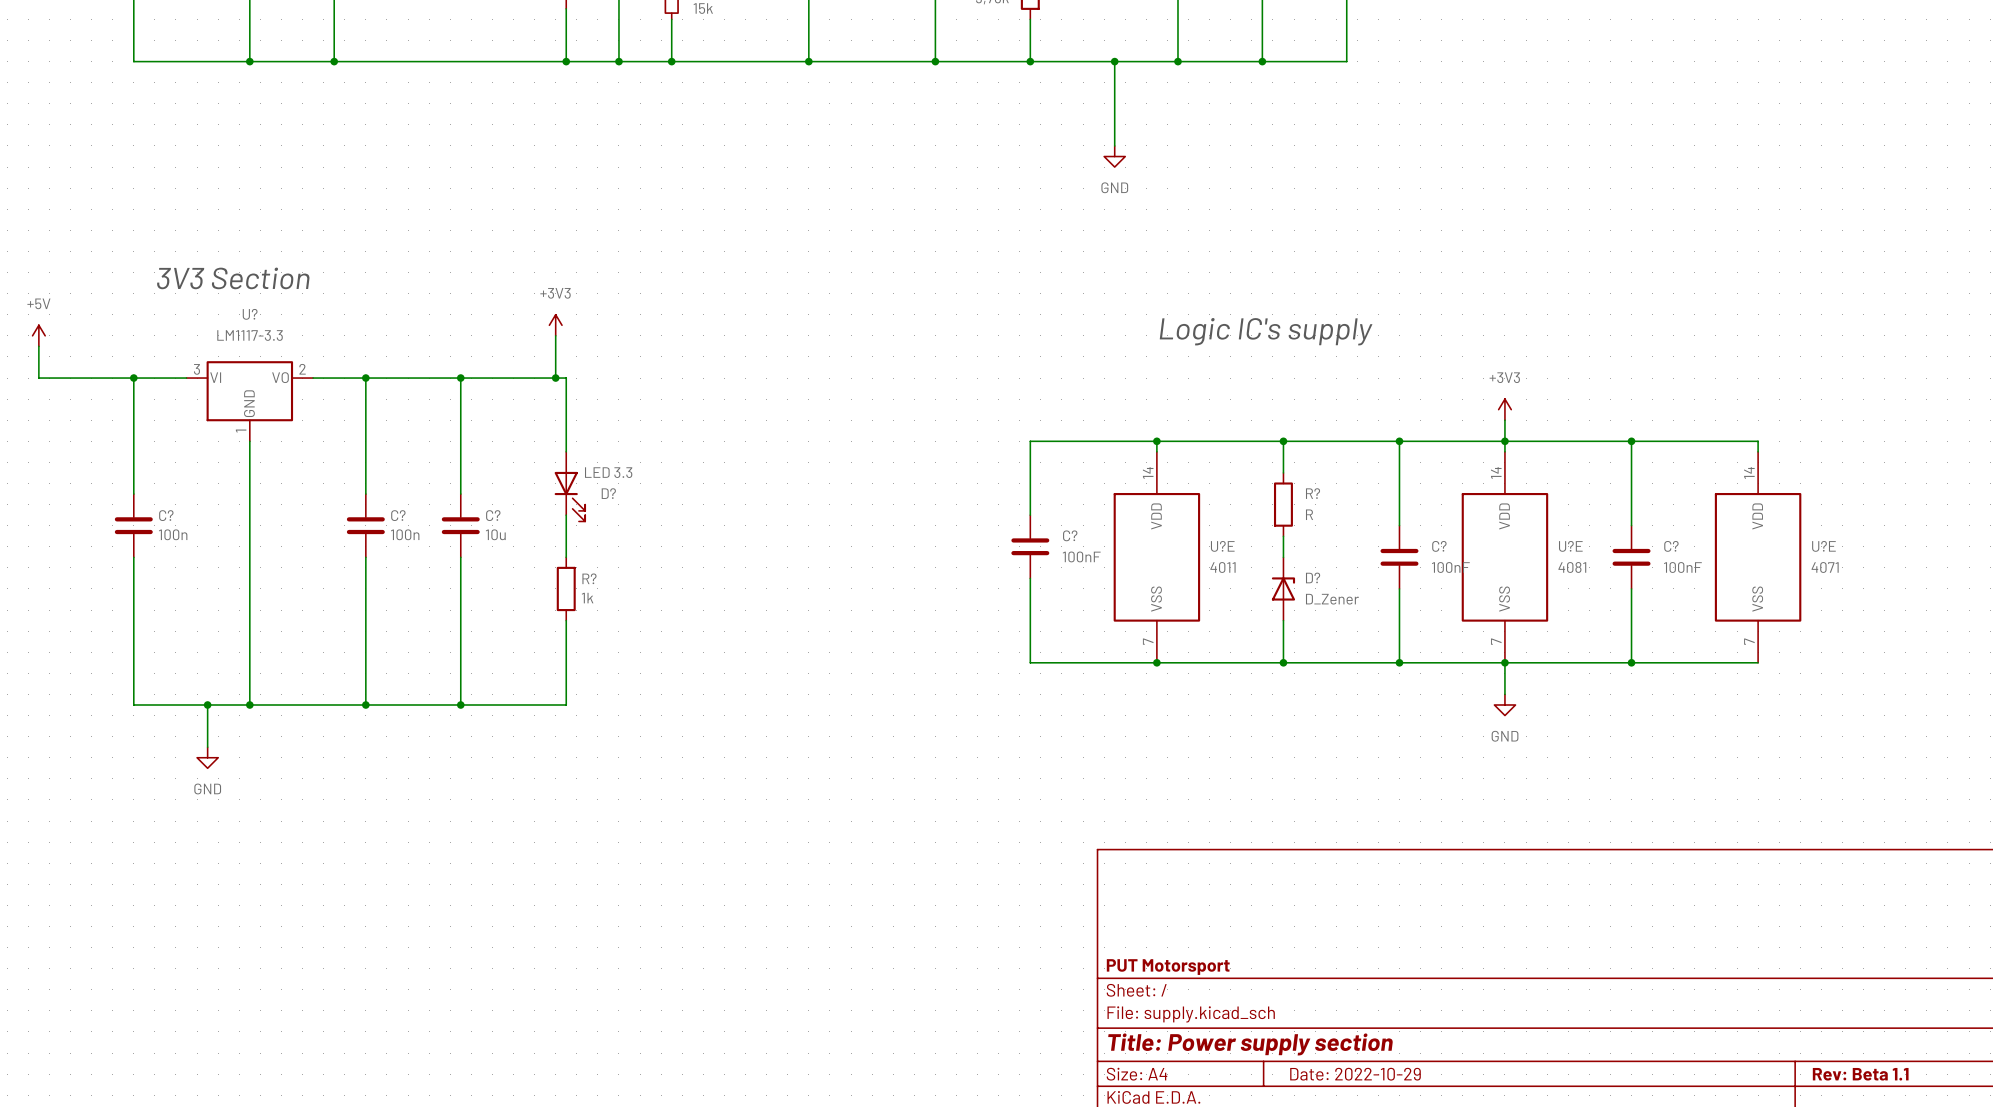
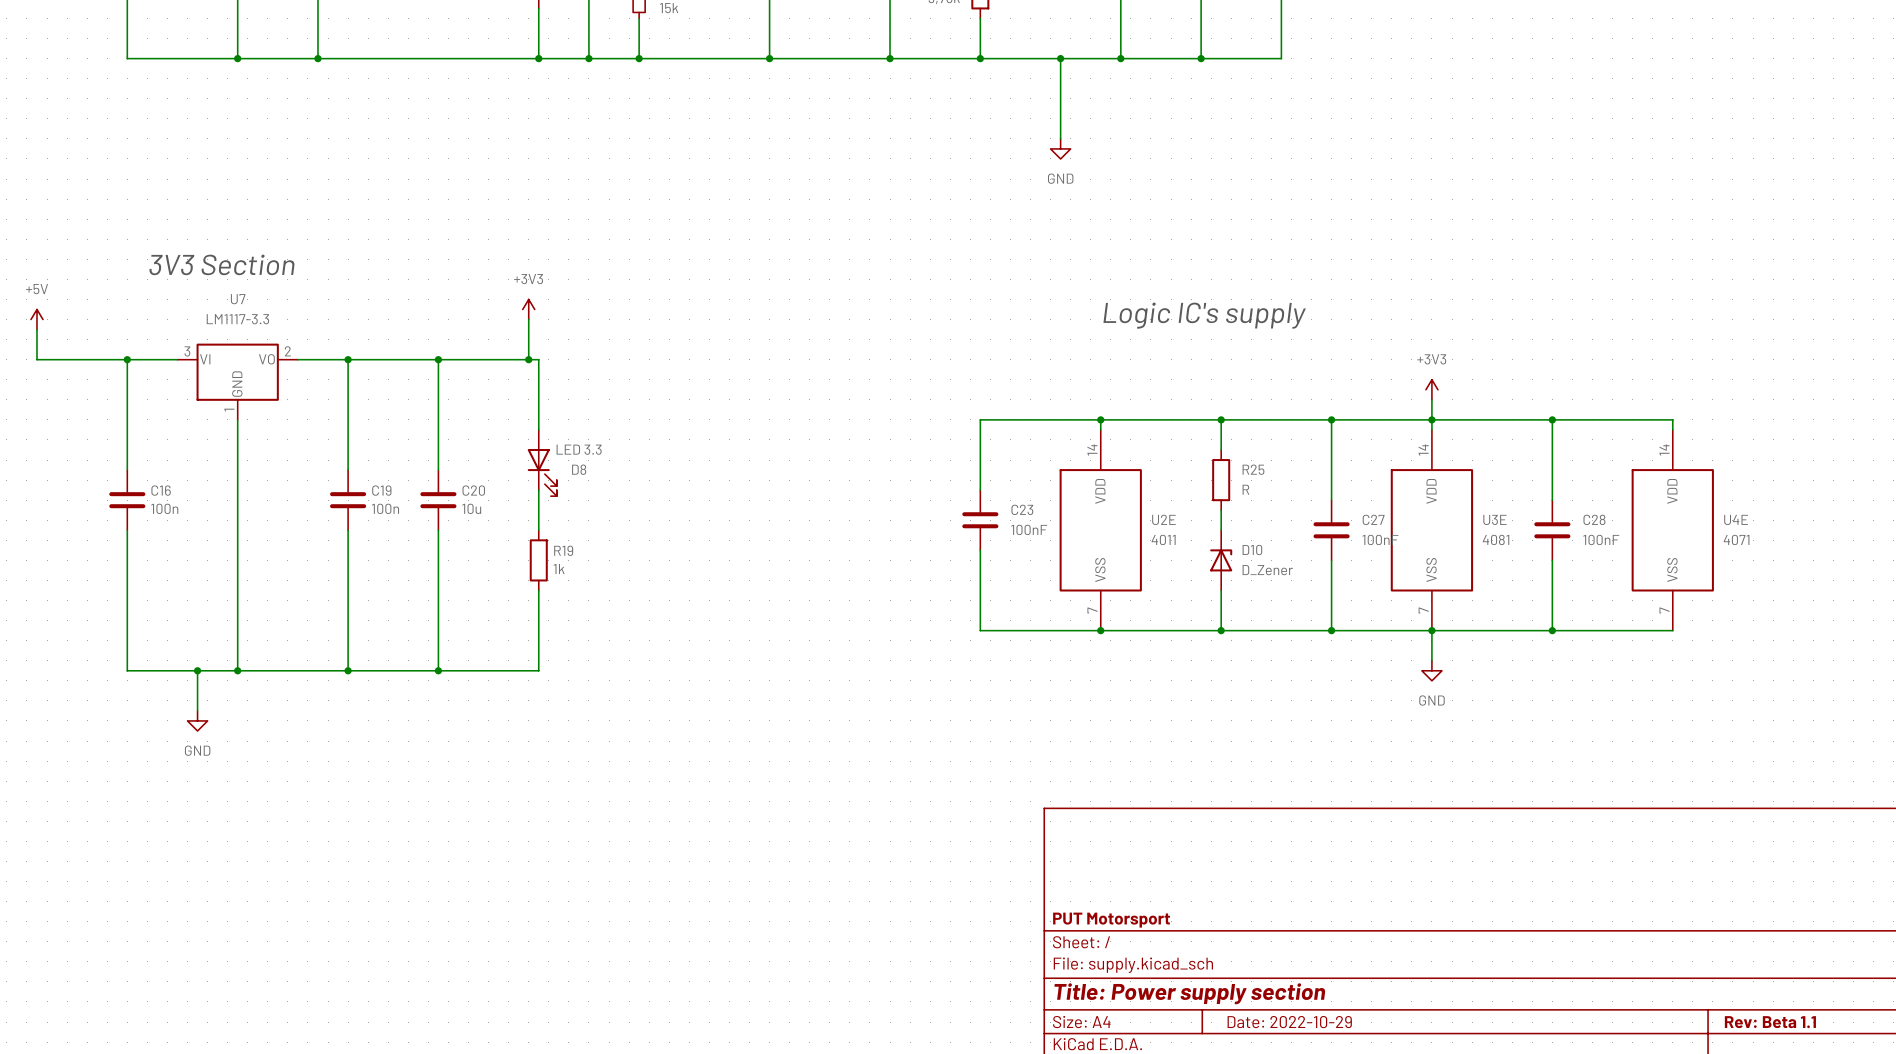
U? name: U? (250, 314) -> U7 (238, 299)
D? name: D? (608, 493) -> D8 (579, 469)
R? name: R? (1313, 493) -> R25 (1253, 469)
C? name: C? (166, 515) -> C16 (161, 490)
C? name: C? (398, 515) -> C19 (381, 490)
C? name: C? (493, 515) -> C20 (473, 490)
C? name: C? (1070, 535) -> C23 (1022, 509)
U?E name: U?E (1222, 546) -> U2E (1163, 519)
C? name: C? (1439, 546) -> C27 (1373, 519)
U?E name: U?E (1570, 546) -> U3E (1494, 519)
C? name: C? (1671, 546) -> C28 (1594, 519)
U?E name: U?E (1823, 546) -> U4E (1736, 519)
D? name: D? (1313, 577) -> D10 (1252, 549)
R? name: R? (589, 578) -> R19 (563, 550)

